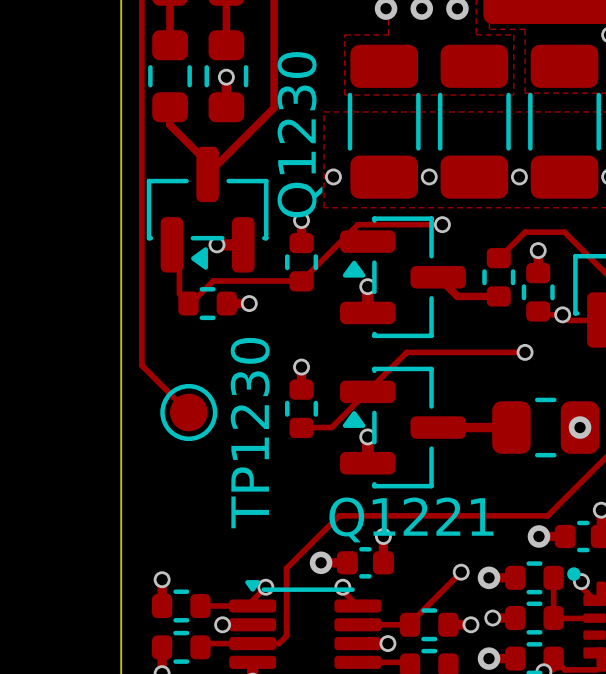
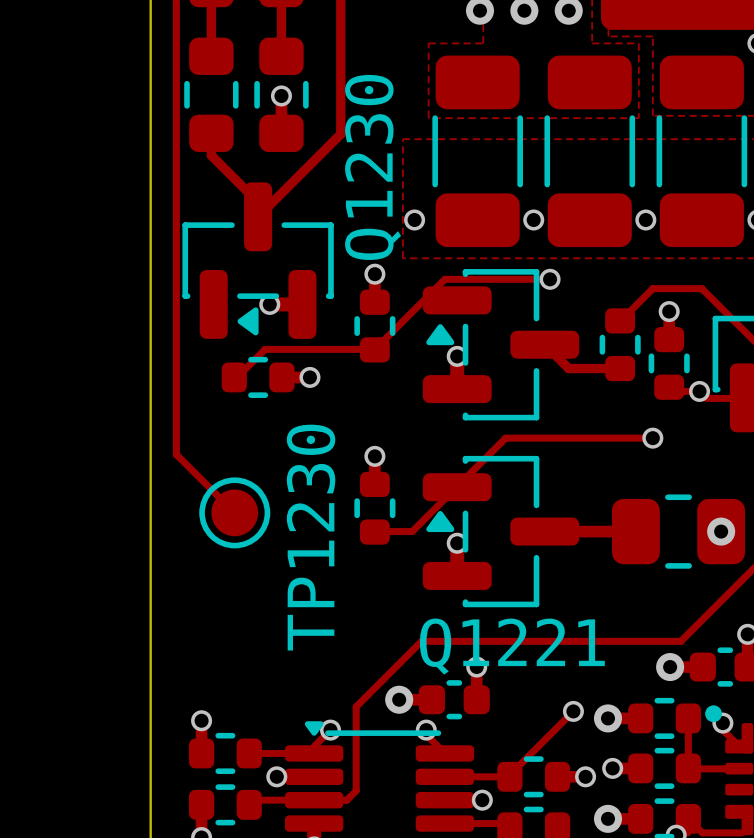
track: (179, 252) (179, 294) -> none

